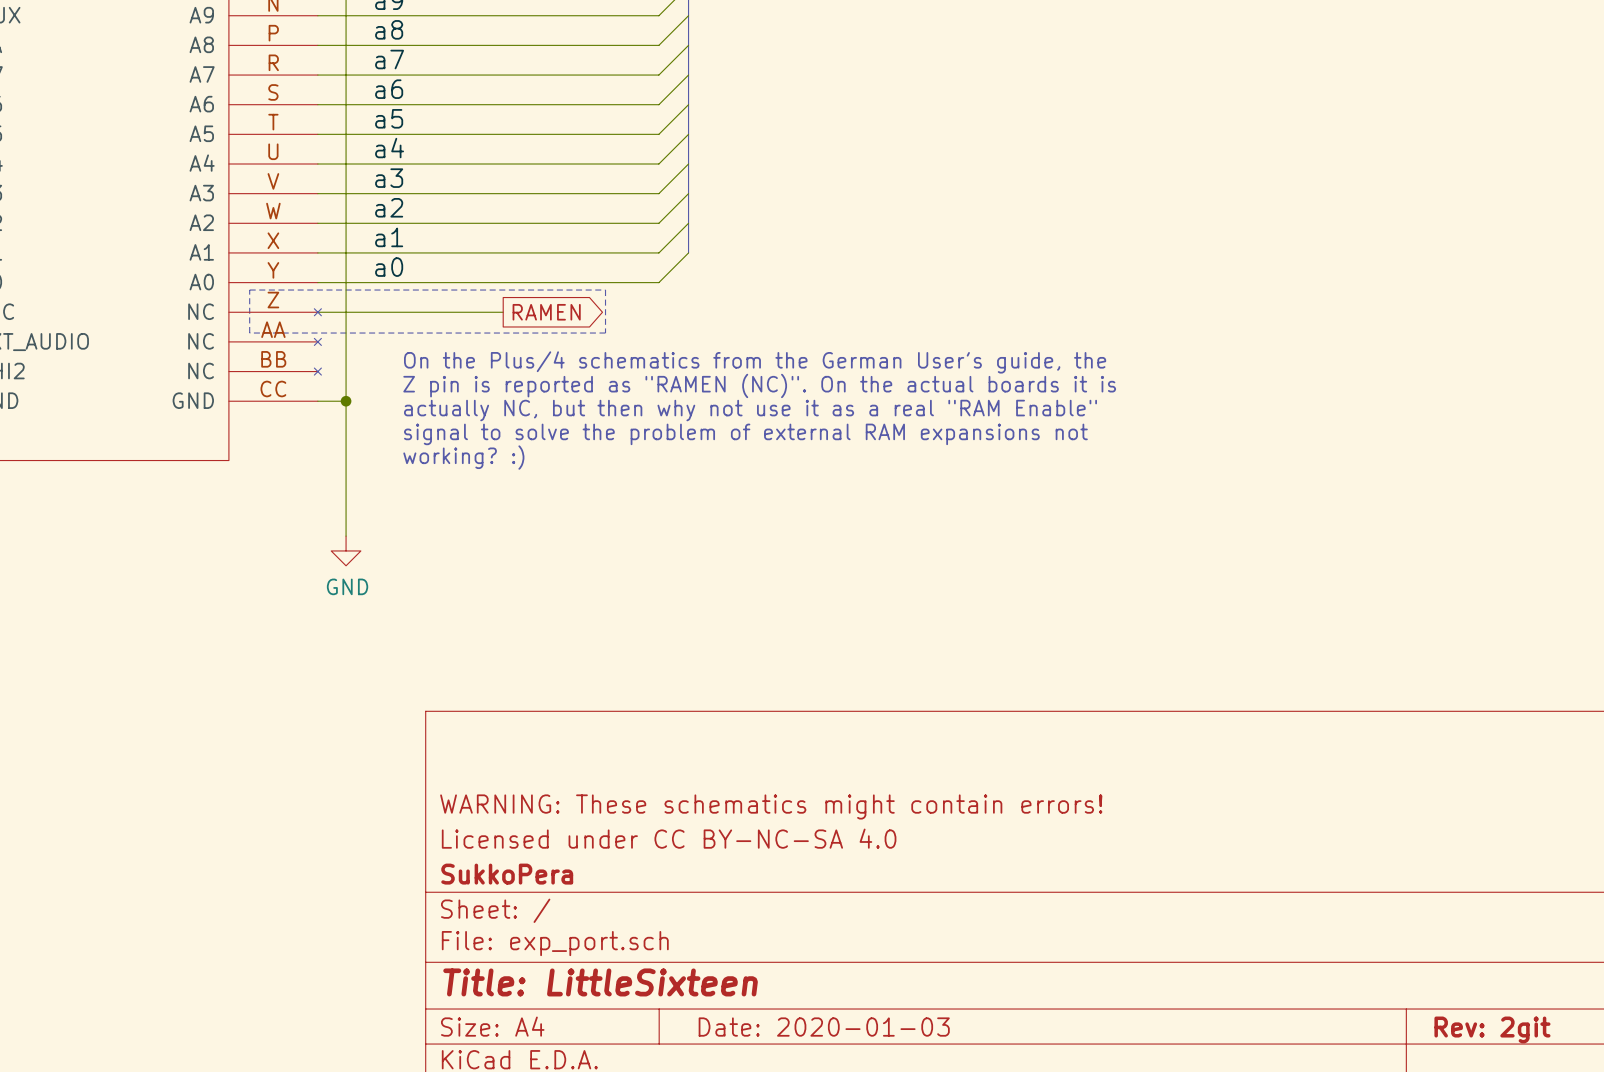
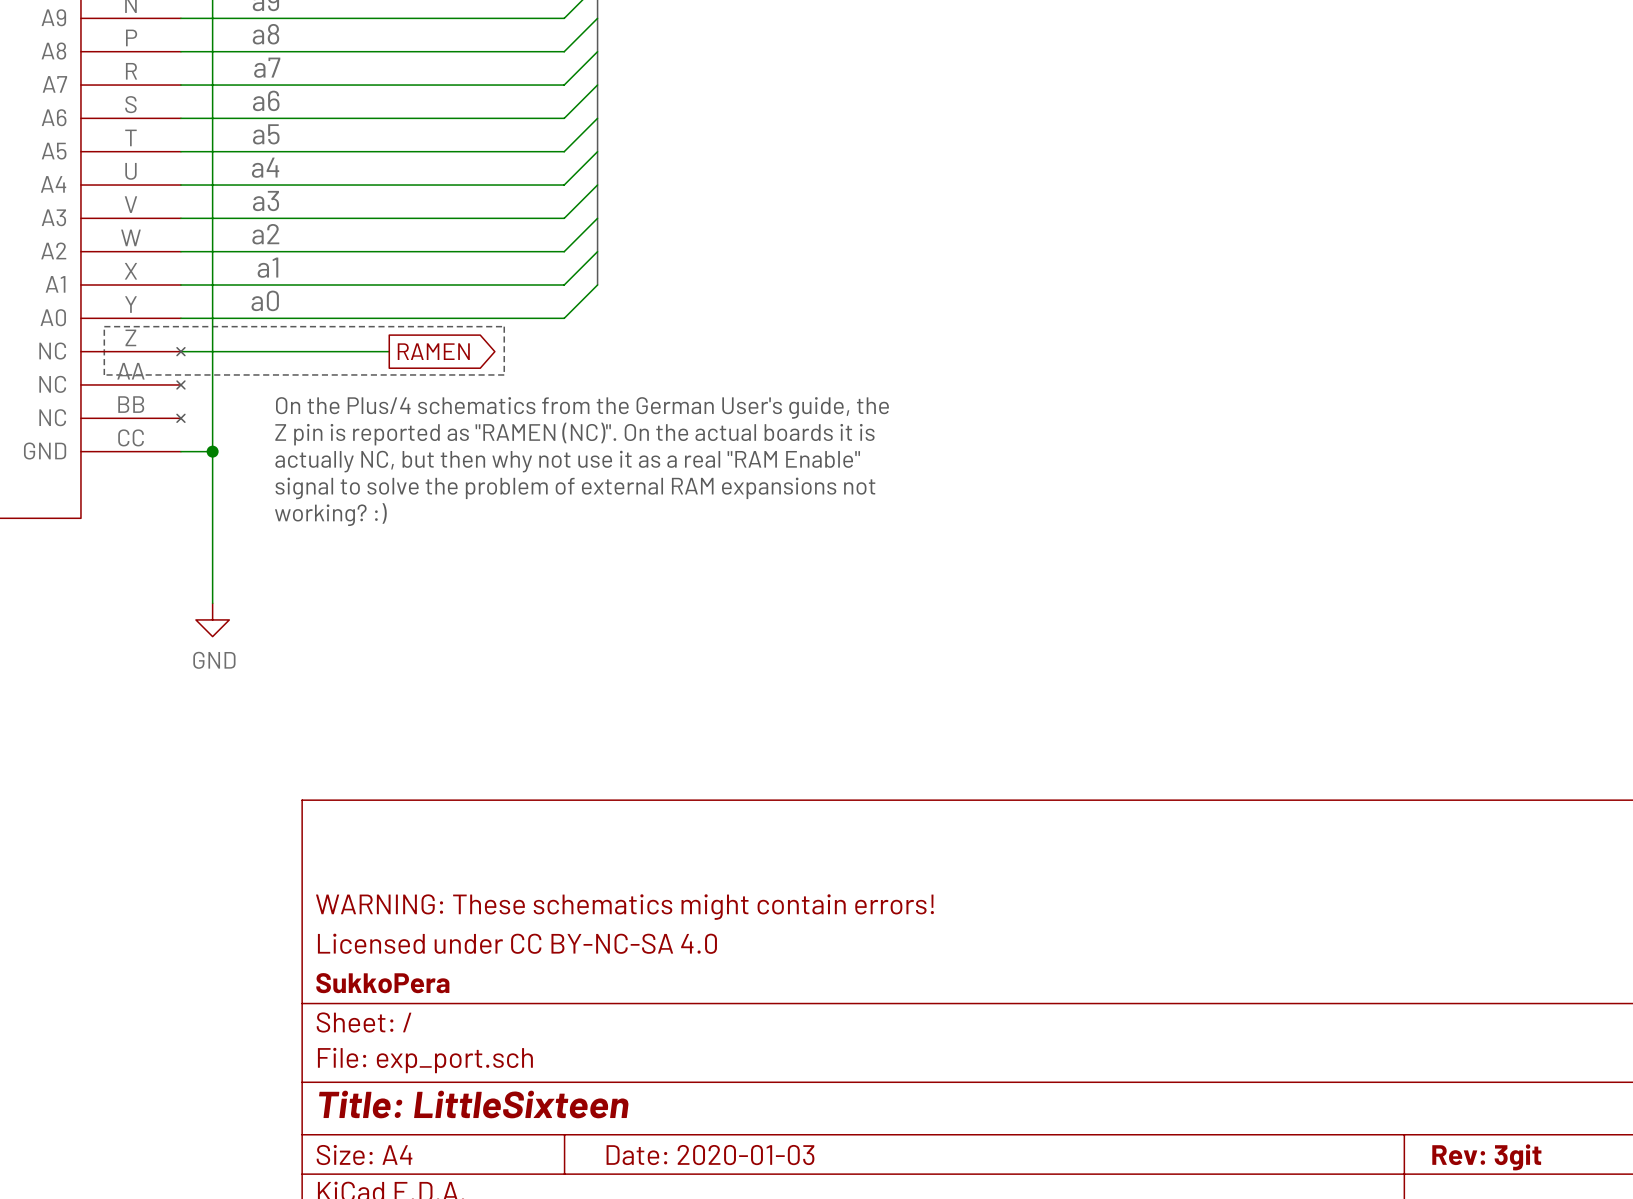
title block: Rev: 2git (1492, 1029) -> Rev: 3git (1486, 1157)

